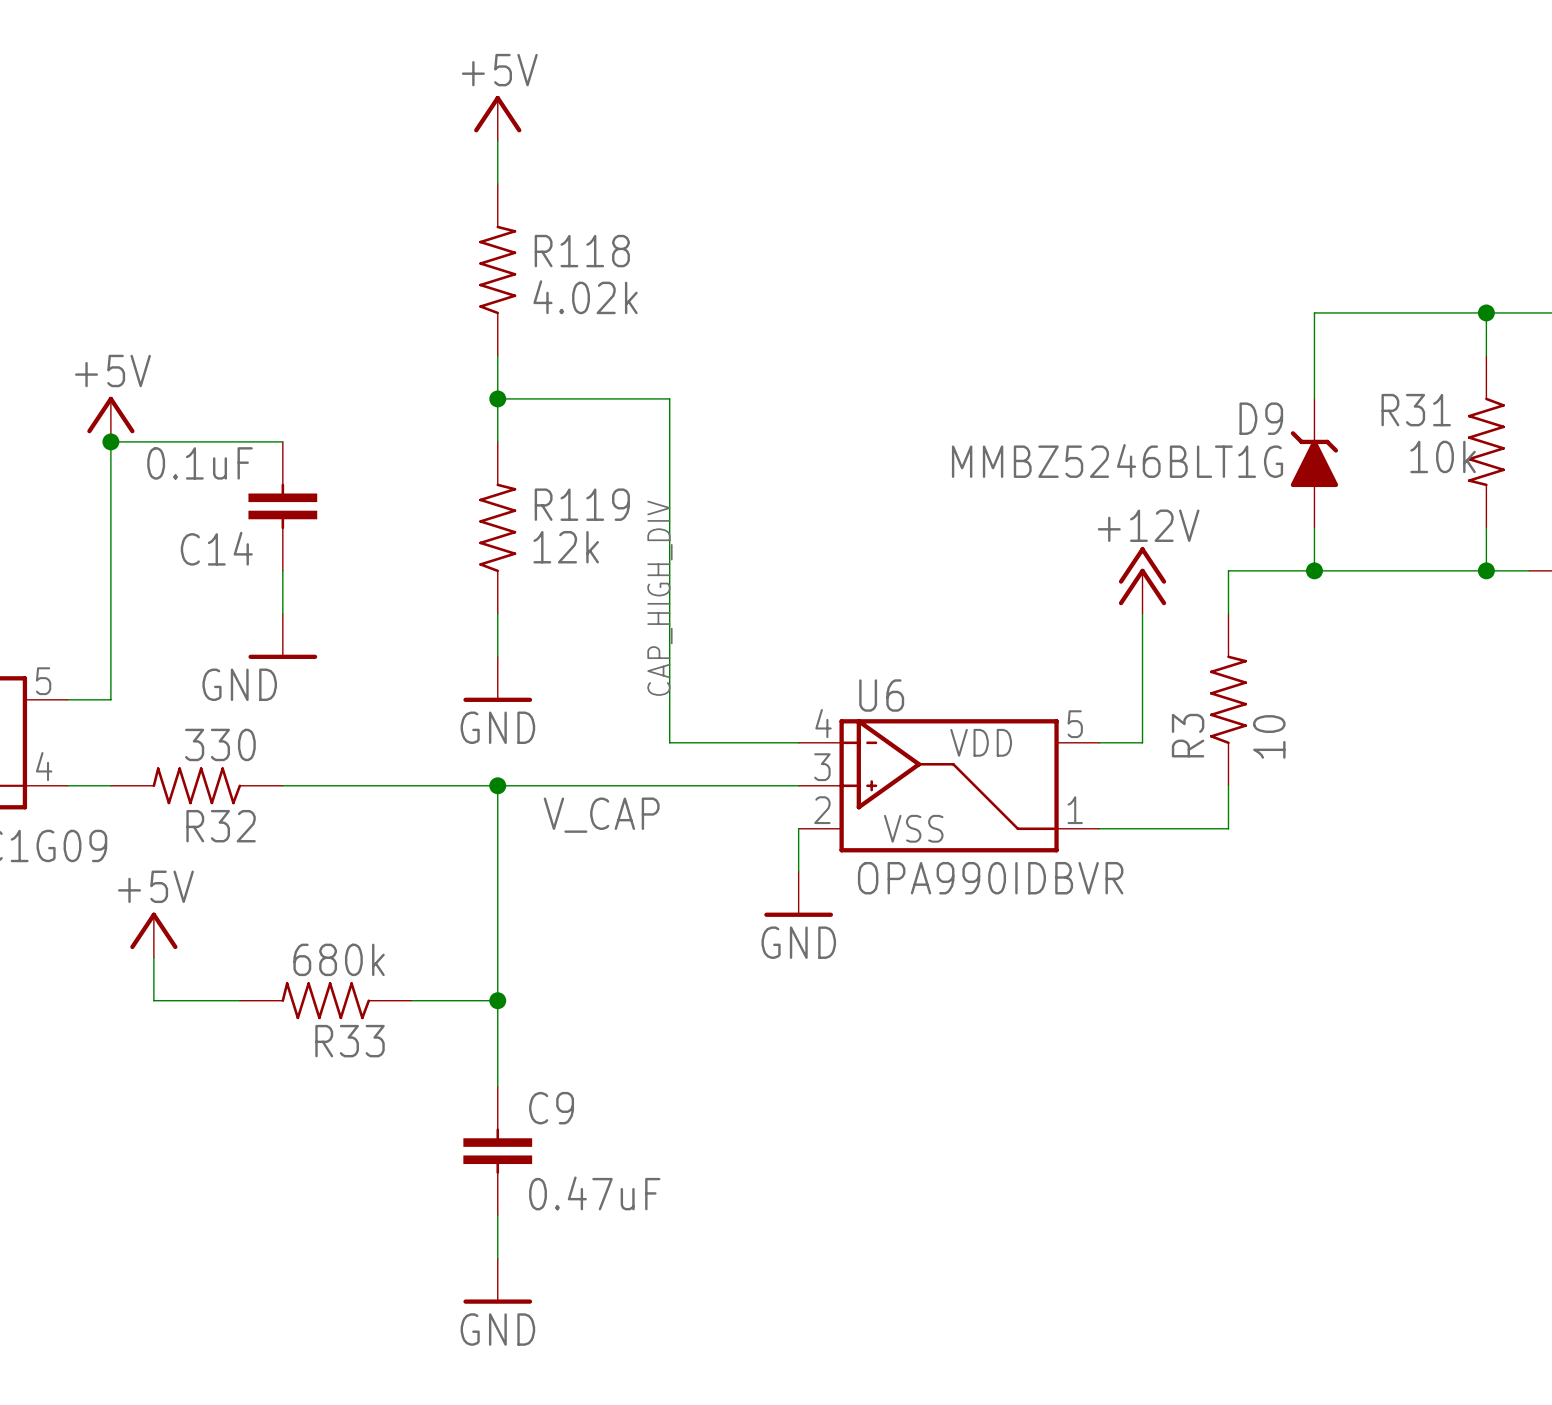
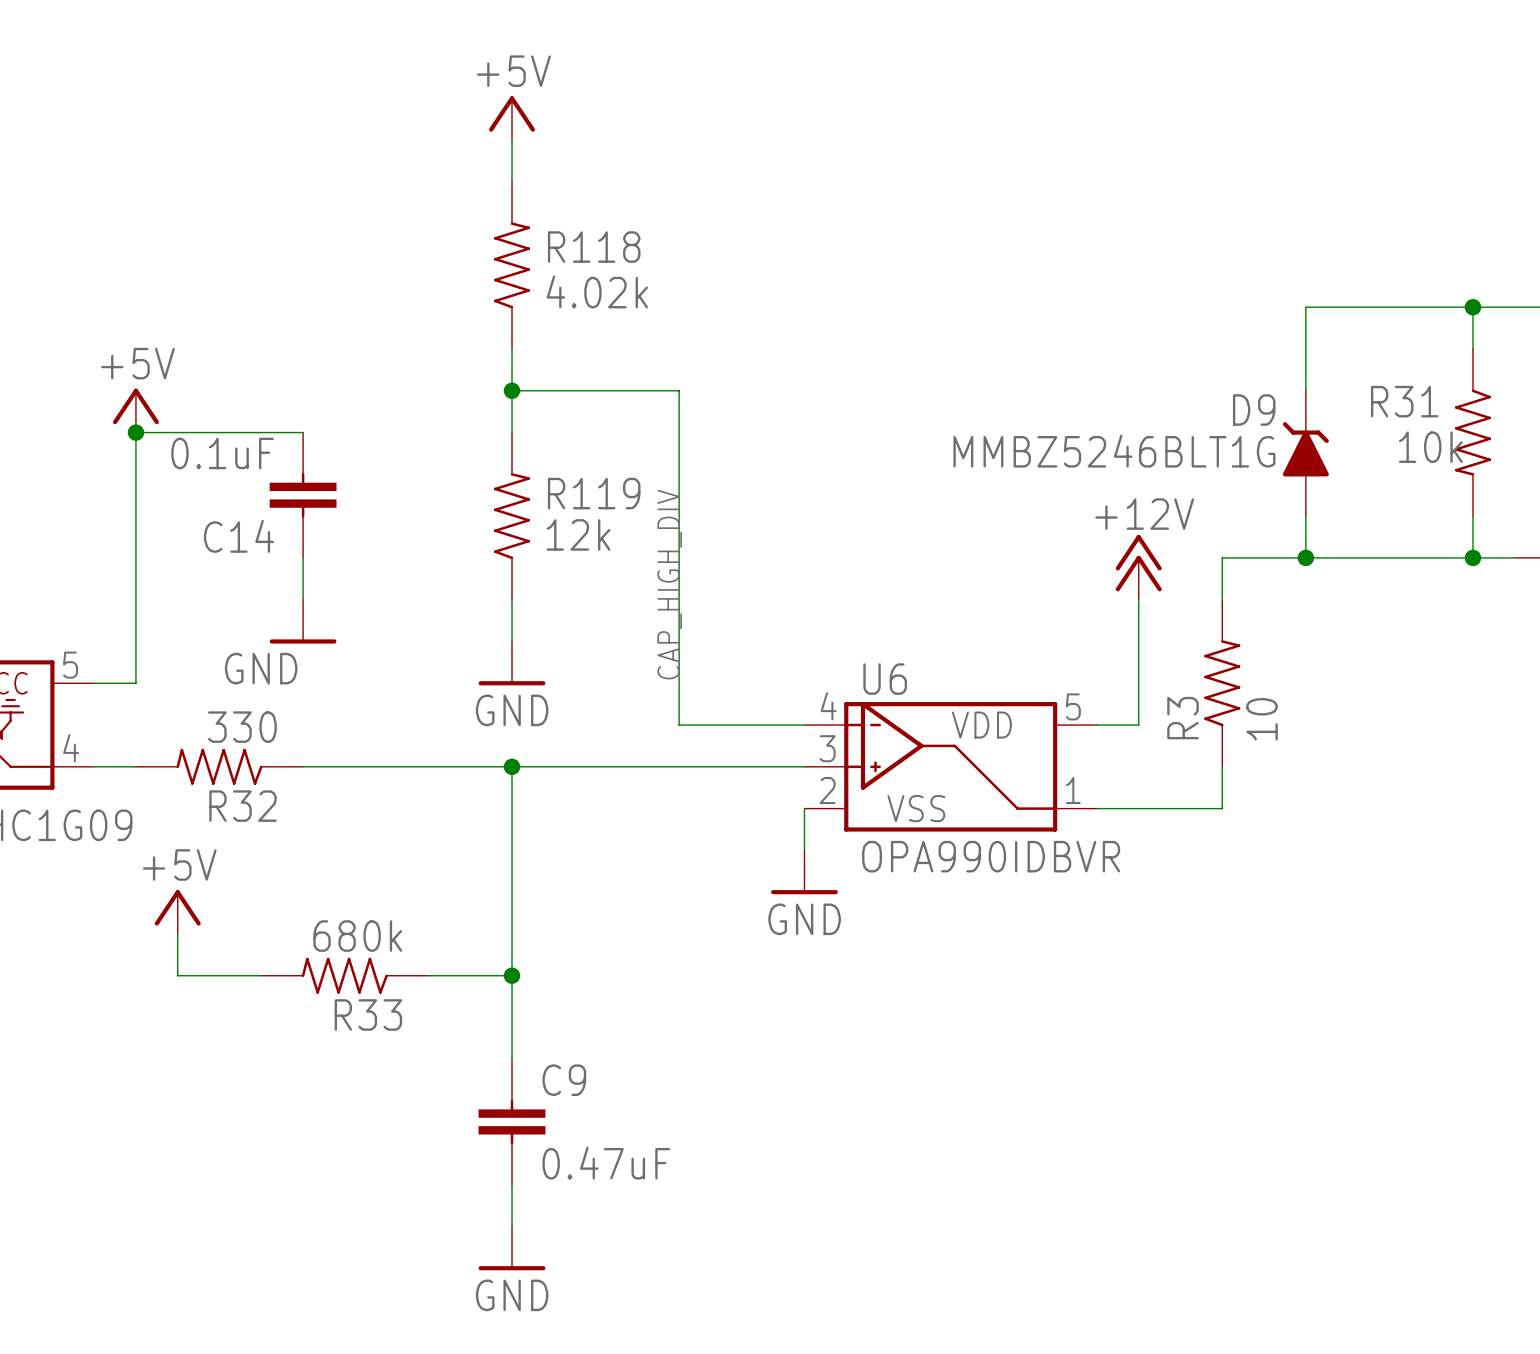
label: V_CAP (601, 815) -> none

